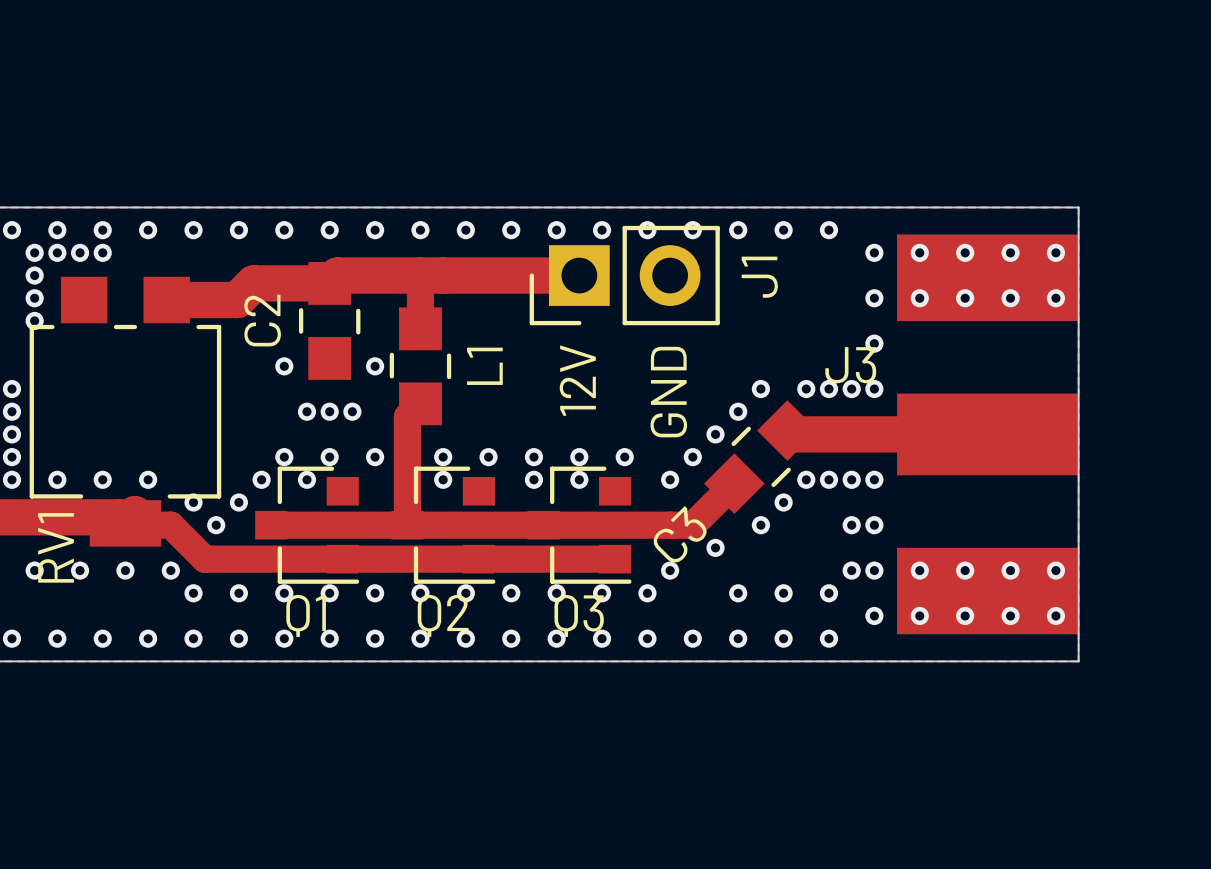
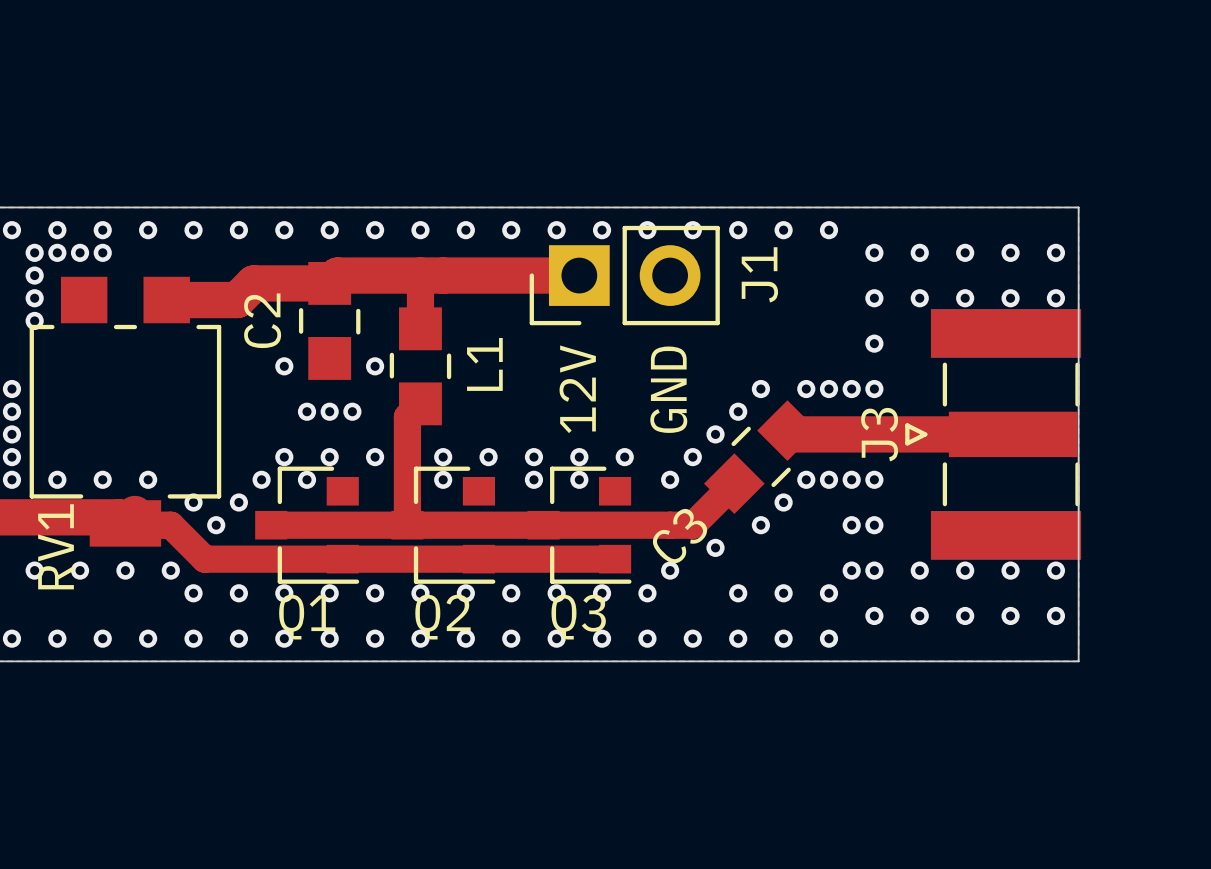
J3 footprint: [897, 234, 1079, 635] -> [905, 309, 1082, 560]
J3 name position: J3 (850, 365) -> J3 (879, 434)

